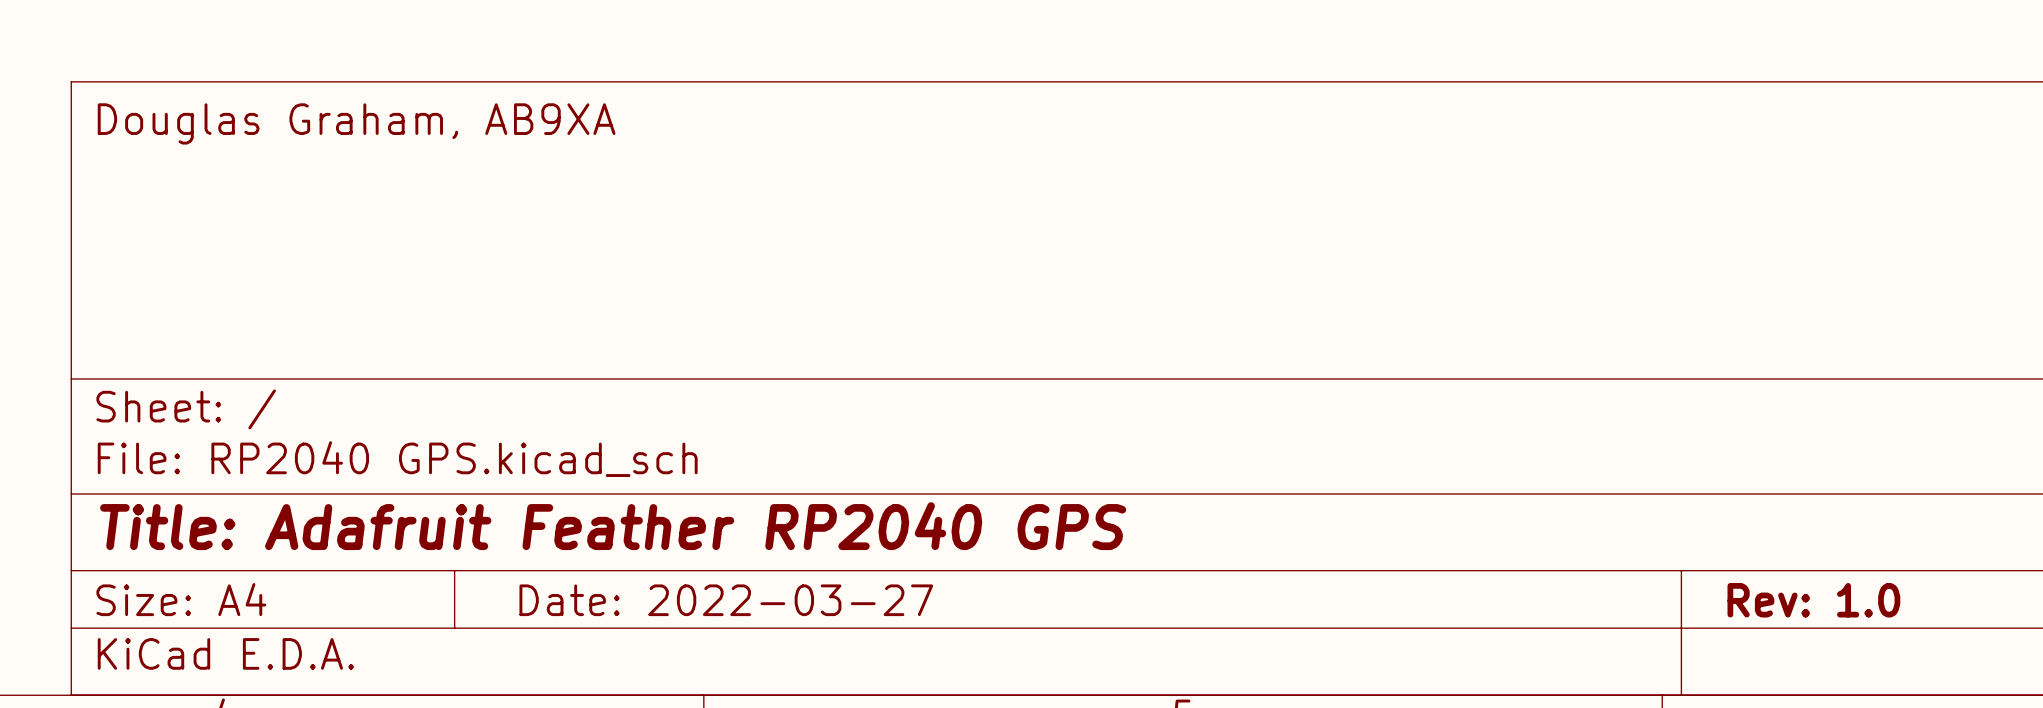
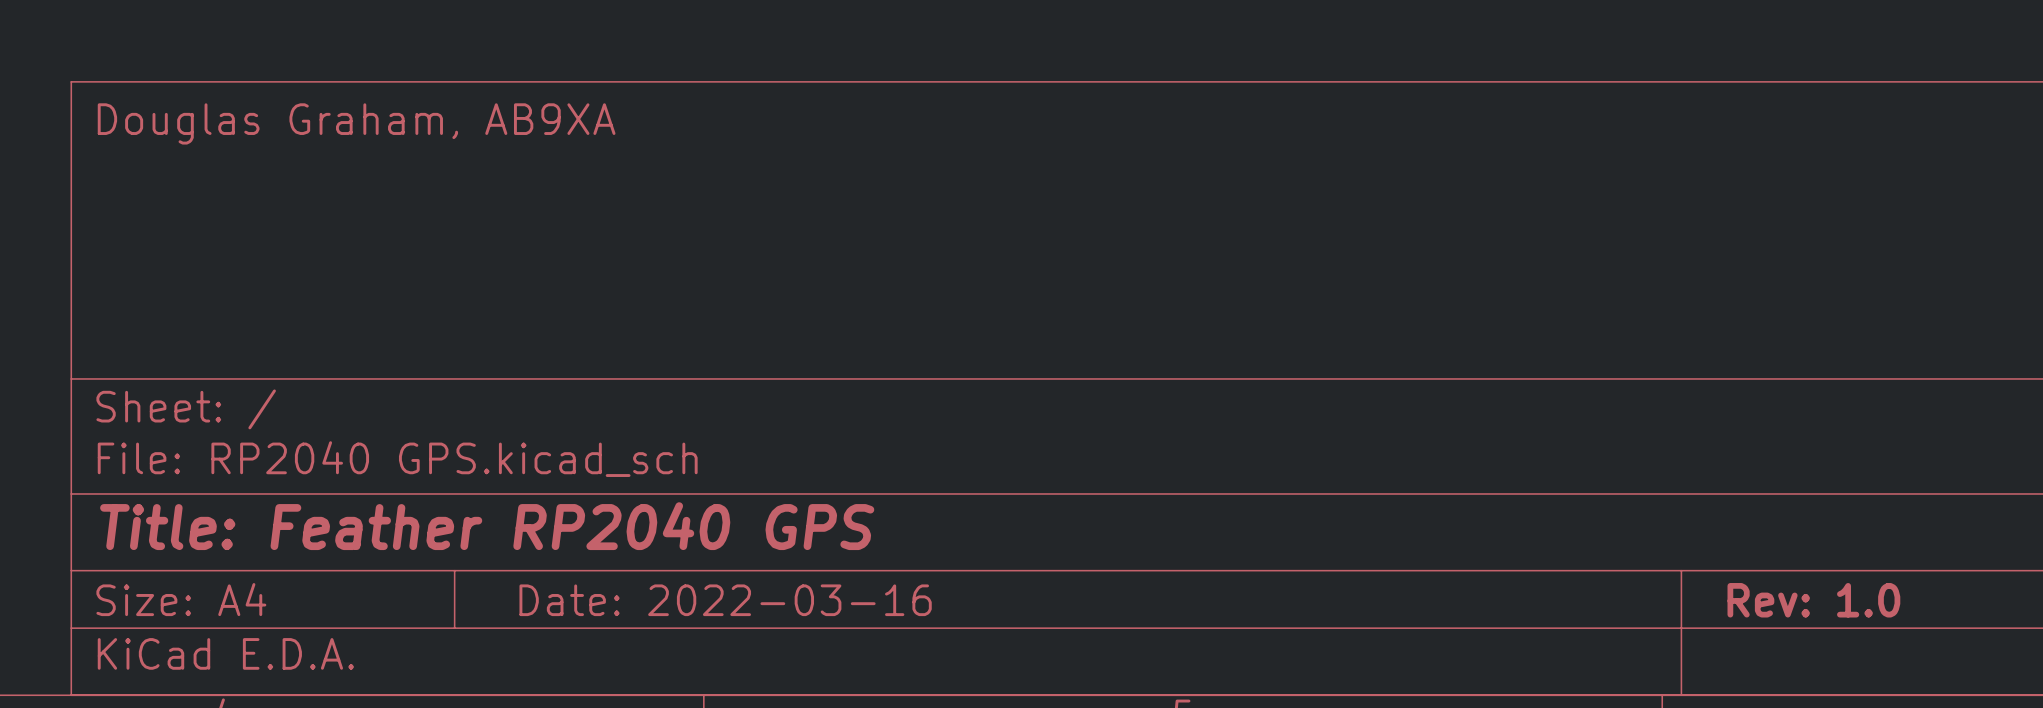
title block: Title: Adafruit Feather RP2040 GPS (613, 526) -> Title: Feather RP2040 GPS (487, 526)
title block: Date: 2022-03-27 (726, 600) -> Date: 2022-03-16 (725, 600)

